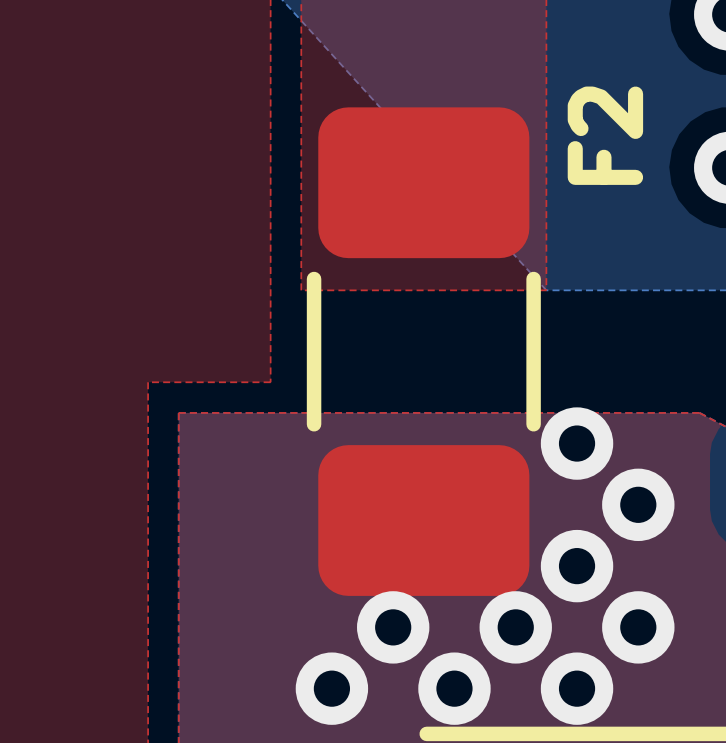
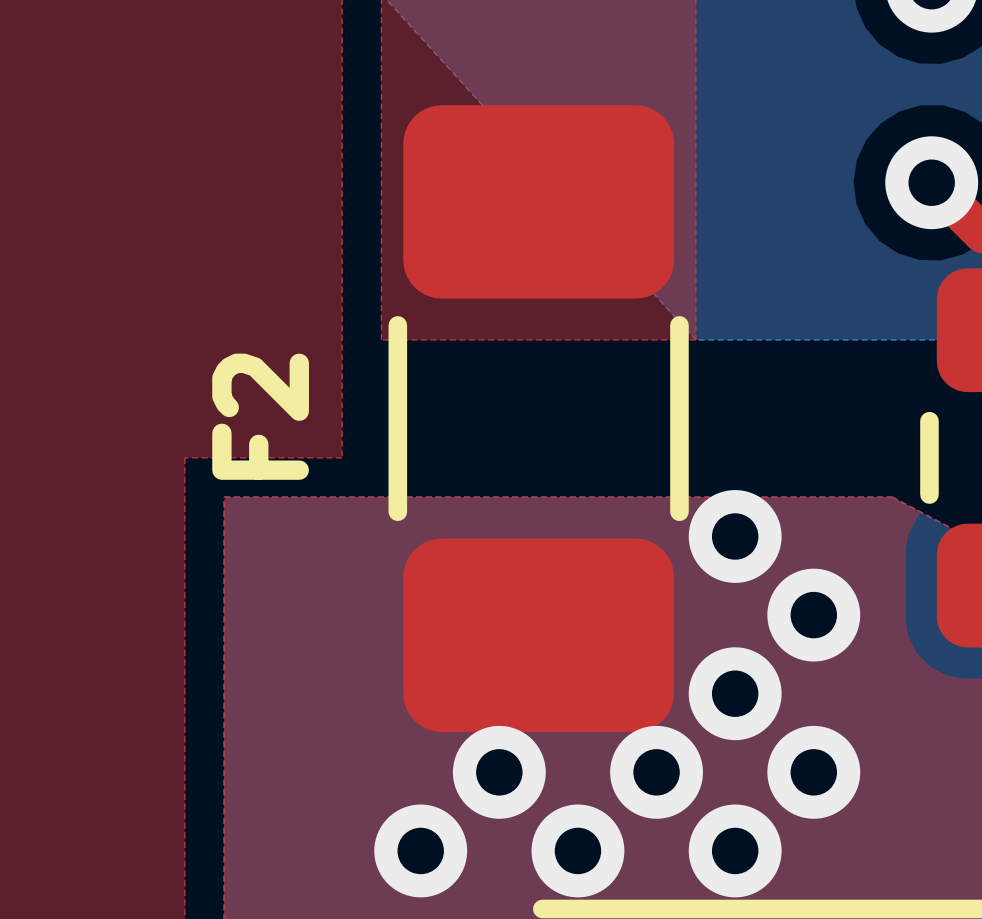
F2 name position: F2 (605, 135) -> F2 (260, 416)

